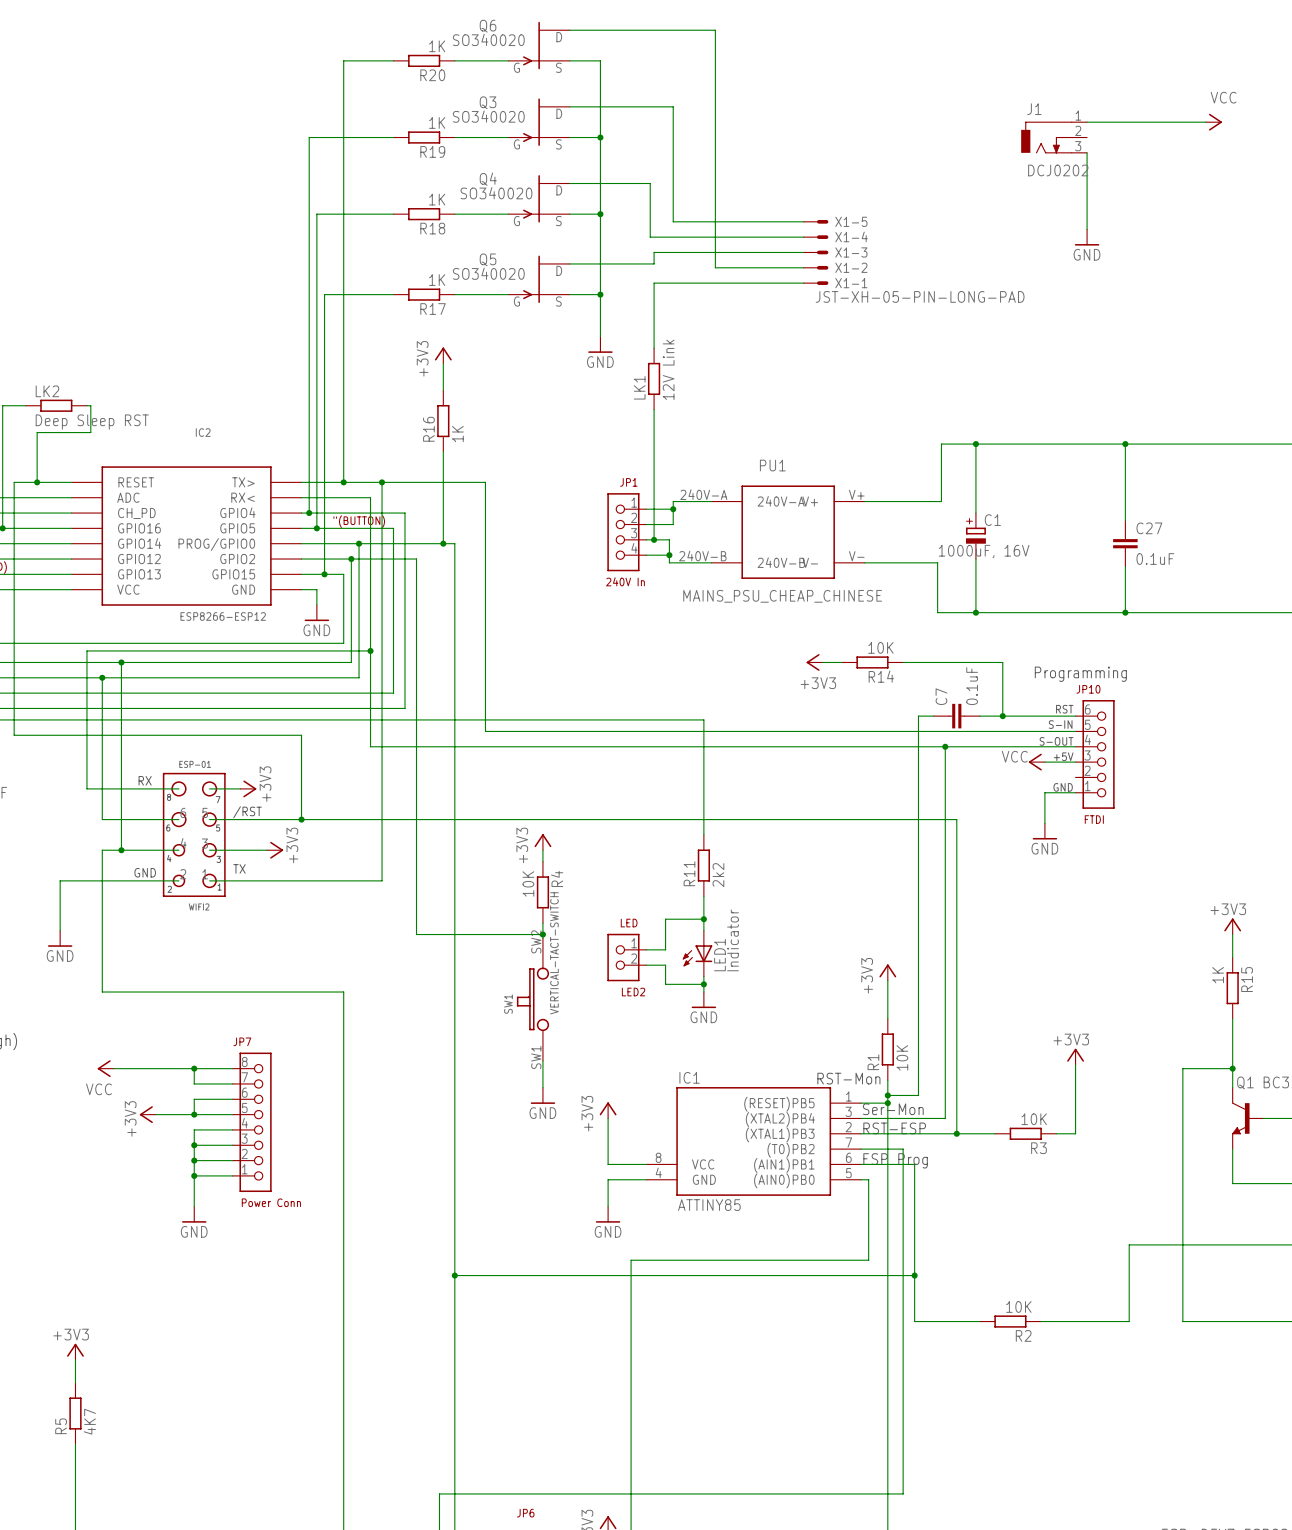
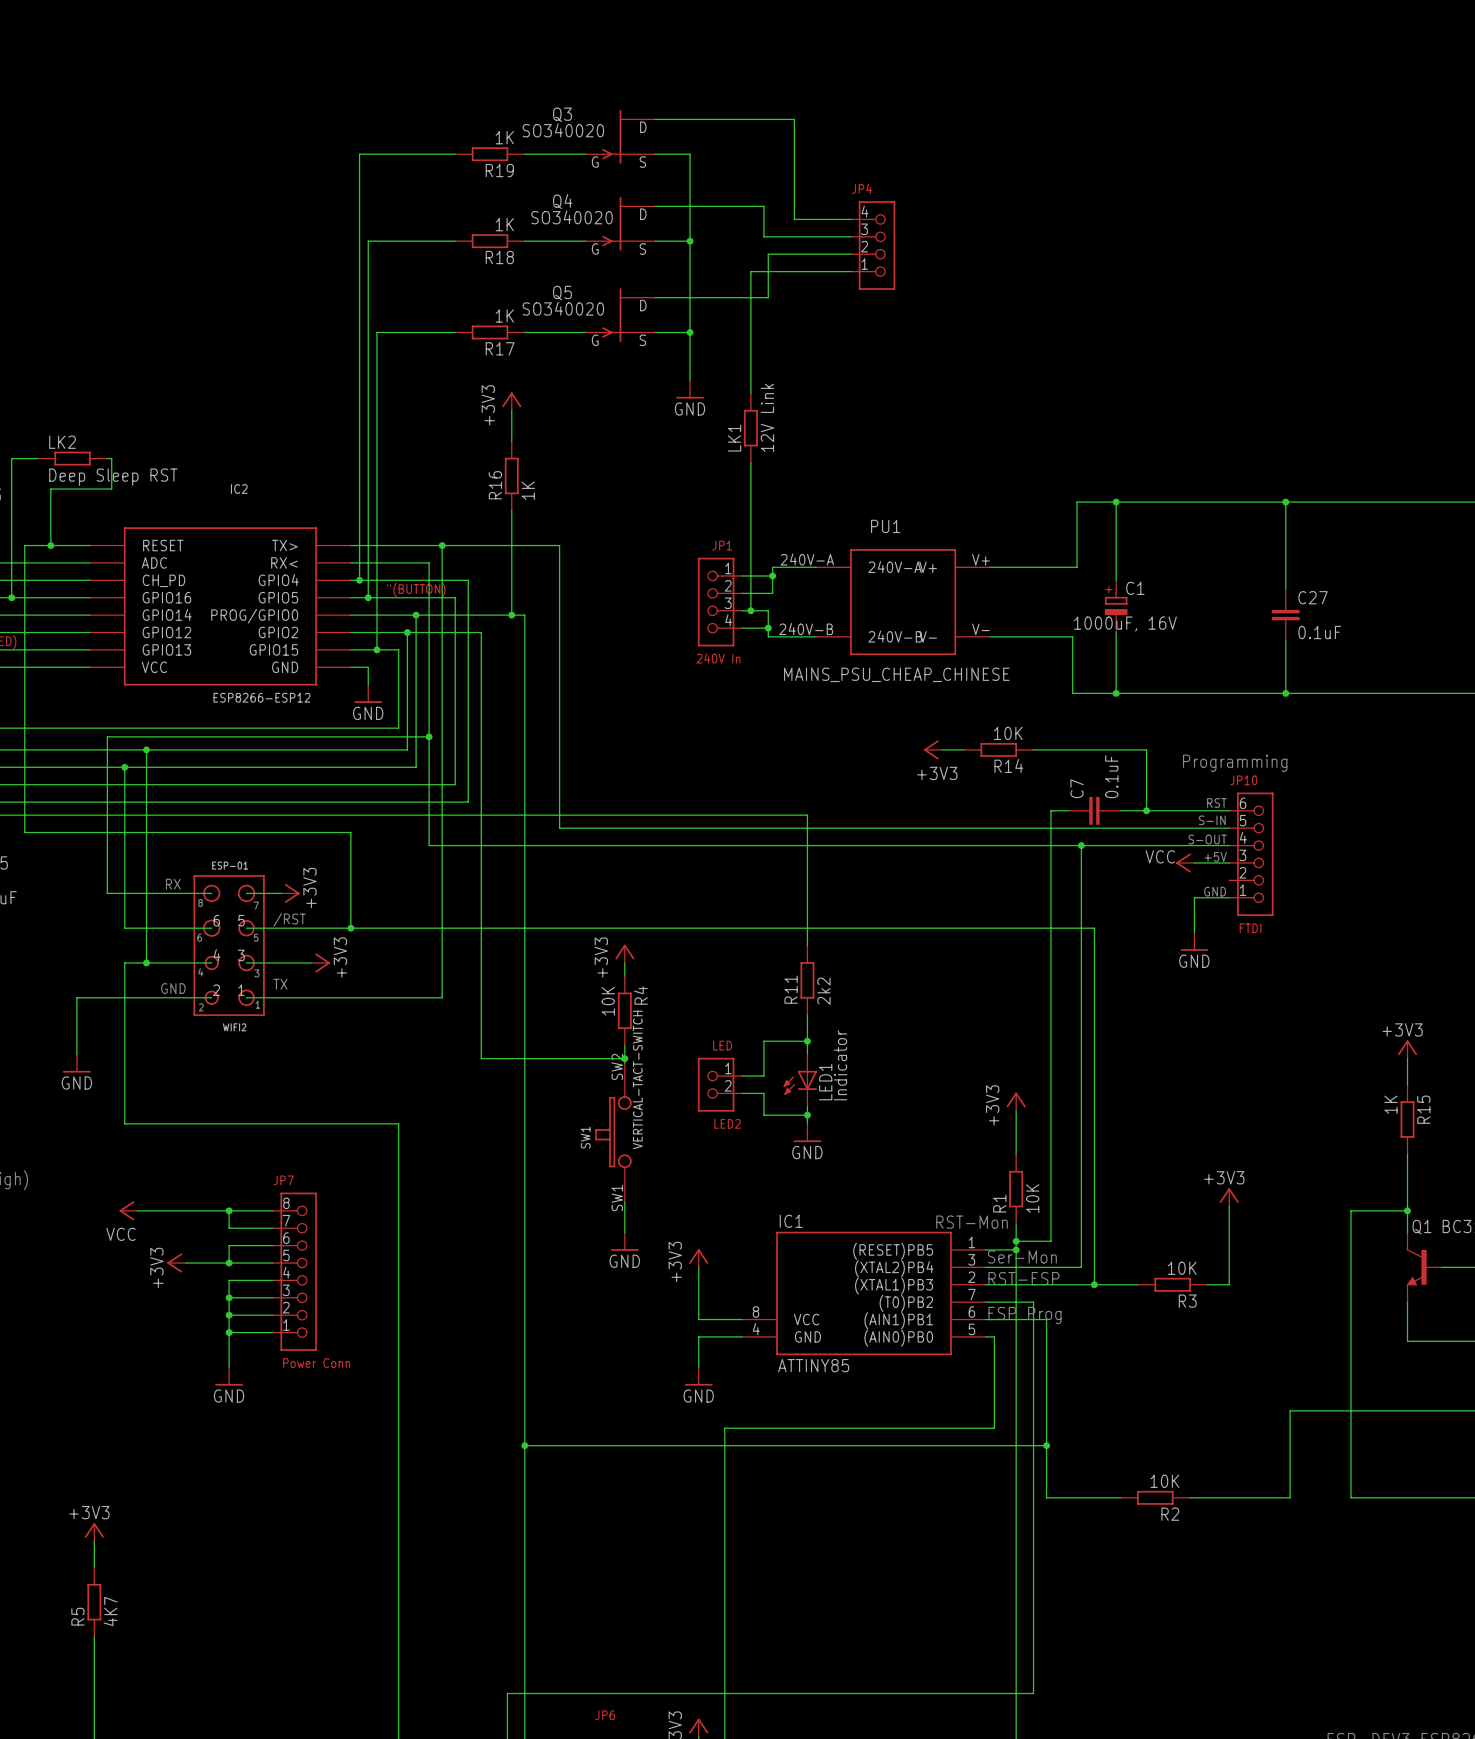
wire: (569, 30) (715, 30) (715, 267) (803, 267) -> none
Q6: SO340020 (539, 45) -> none
wire: (393, 60) (343, 60) (343, 482) -> none
R20: 1K (424, 60) -> none
wire: (454, 60) (508, 60) -> none
wire: (569, 60) (600, 60) (600, 137) -> none
wire: (673, 106) (673, 221) (803, 221) -> (772, 119) (794, 119) (794, 219) (850, 219)
wire: (1087, 122) (1205, 122) -> none
power symbol: VCC (1213, 122) -> none
junction: (600, 137) -> none
J1: DCJ0202 (1054, 137) -> none
wire: (1087, 152) (1087, 229) -> none
wire: (650, 183) (650, 237) (803, 237) -> (746, 206) (763, 206) (763, 236) (850, 236)
JP4: none -> (873, 245)
X1-5: (815, 221) -> none
X1-4: (815, 237) -> none
power symbol: GND (1087, 237) -> none
wire: (654, 252) (803, 252) -> (750, 284) (750, 271) (850, 271)
X1-3: (815, 252) -> none
X1-2: (815, 267) -> none
wire: (654, 283) (803, 283) -> (750, 319) (750, 297) (768, 297) (768, 254) (850, 254)
X1-1: JST-XH-05-PIN-LONG-PAD (815, 283) -> none
junction: (343, 482) -> none

